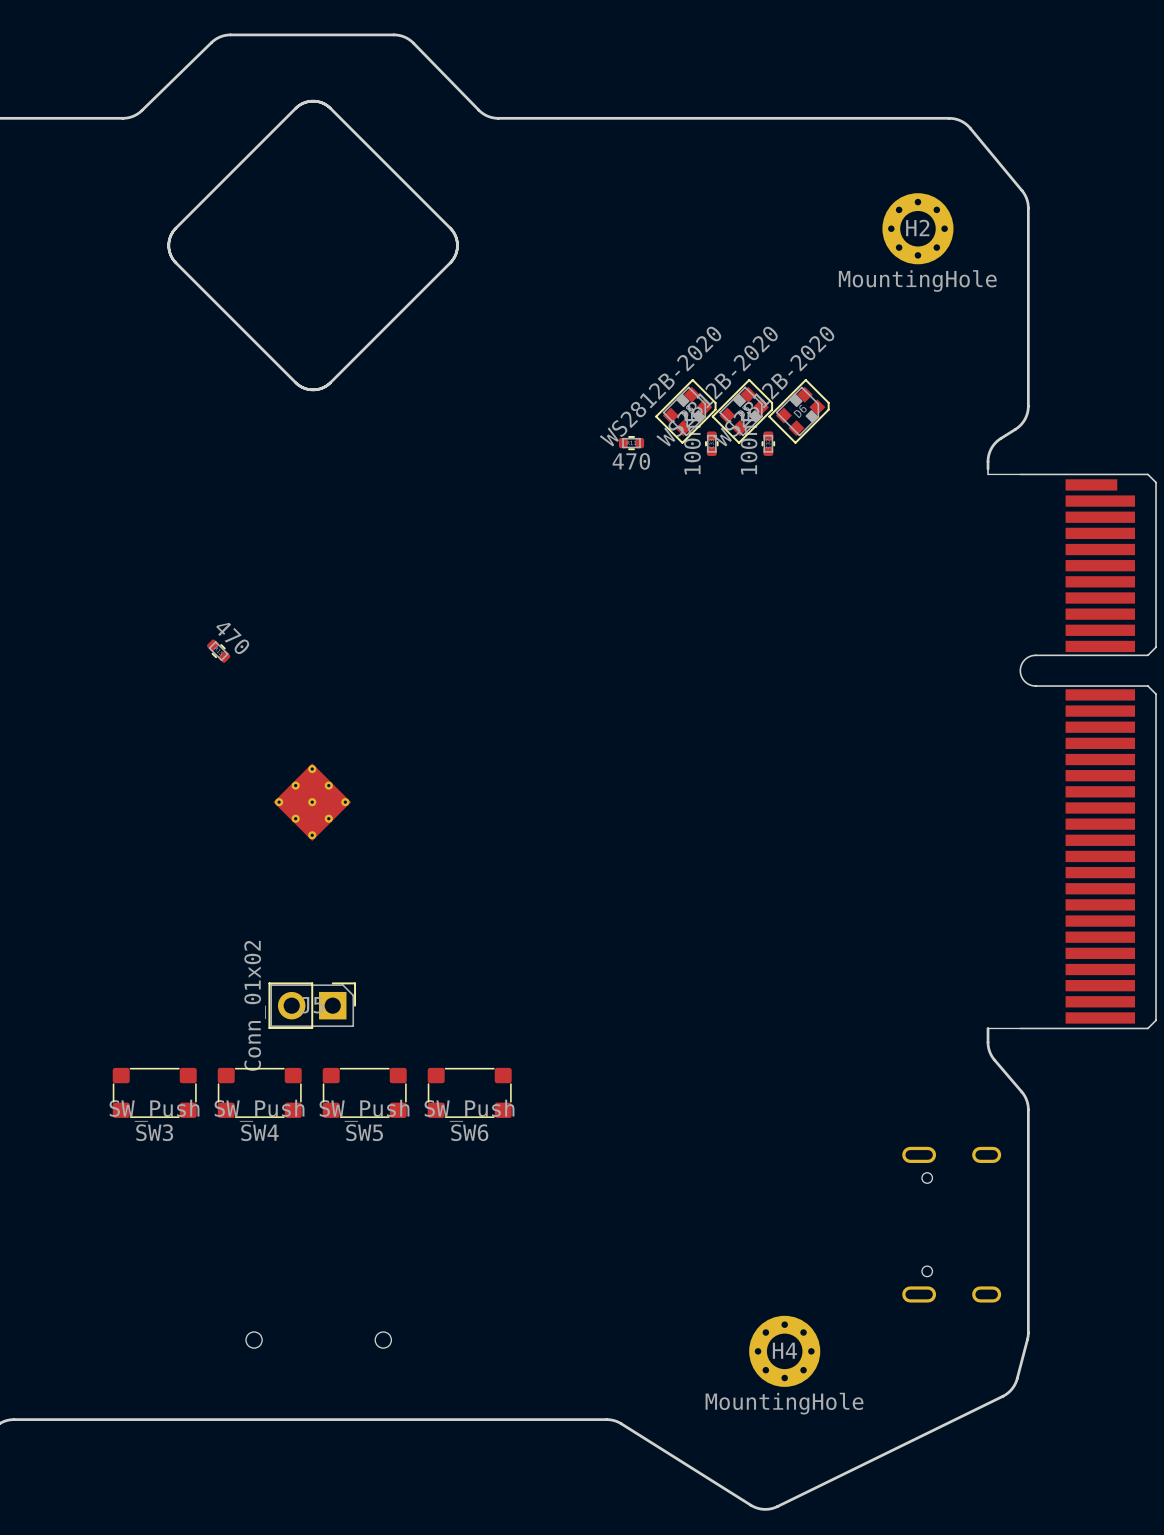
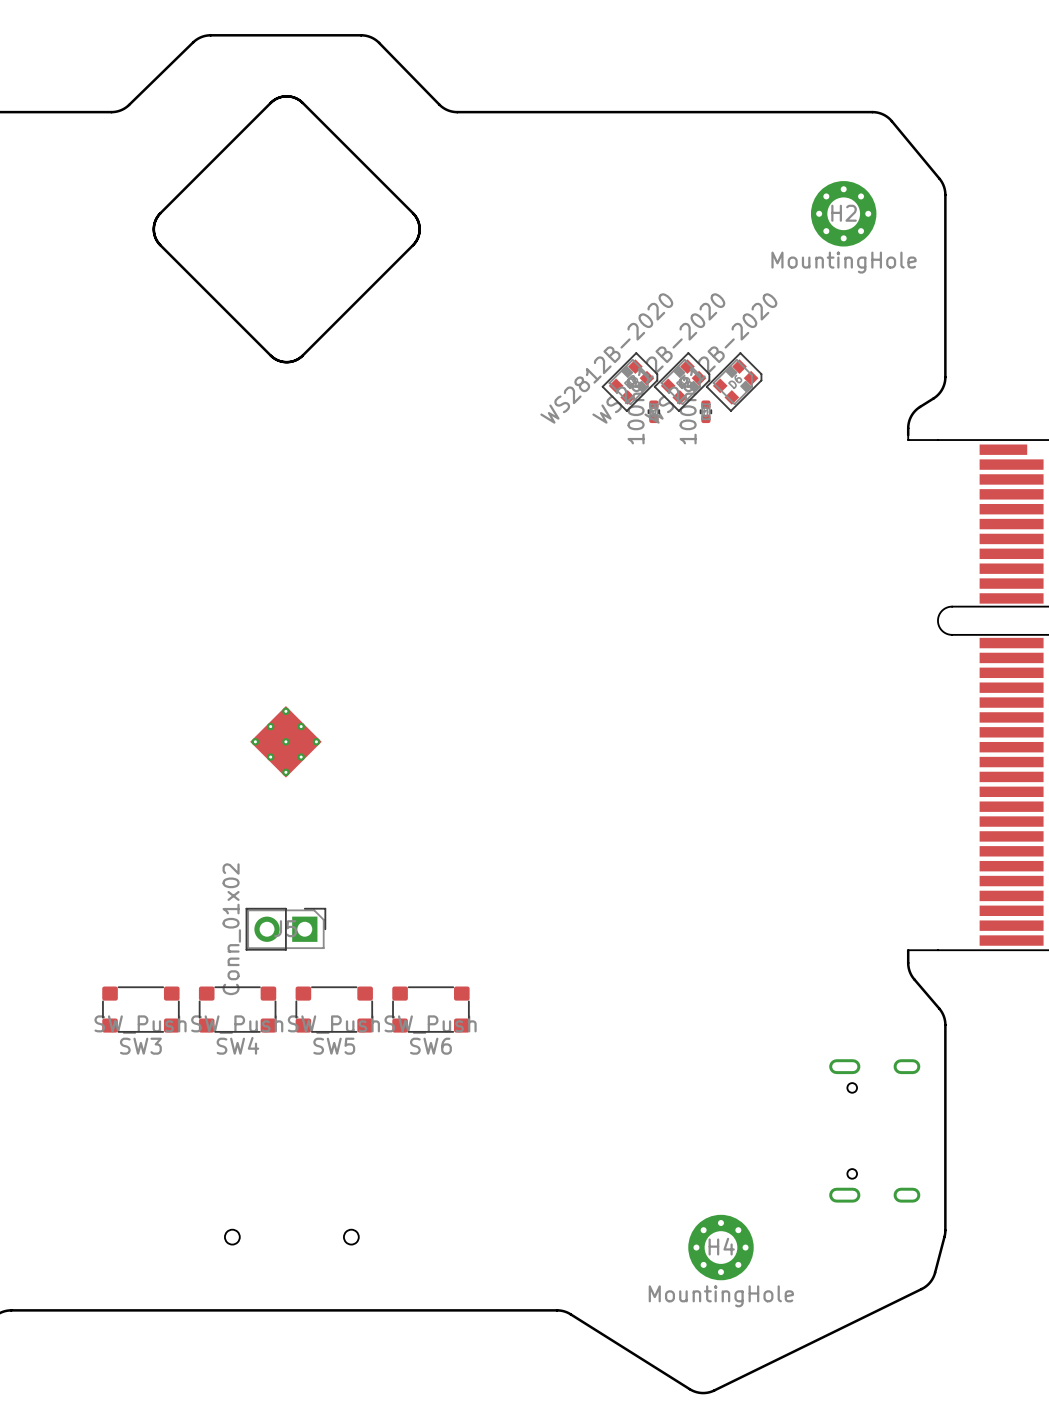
part: 470 (631, 443) -> none
part: 470 (218, 651) -> none

